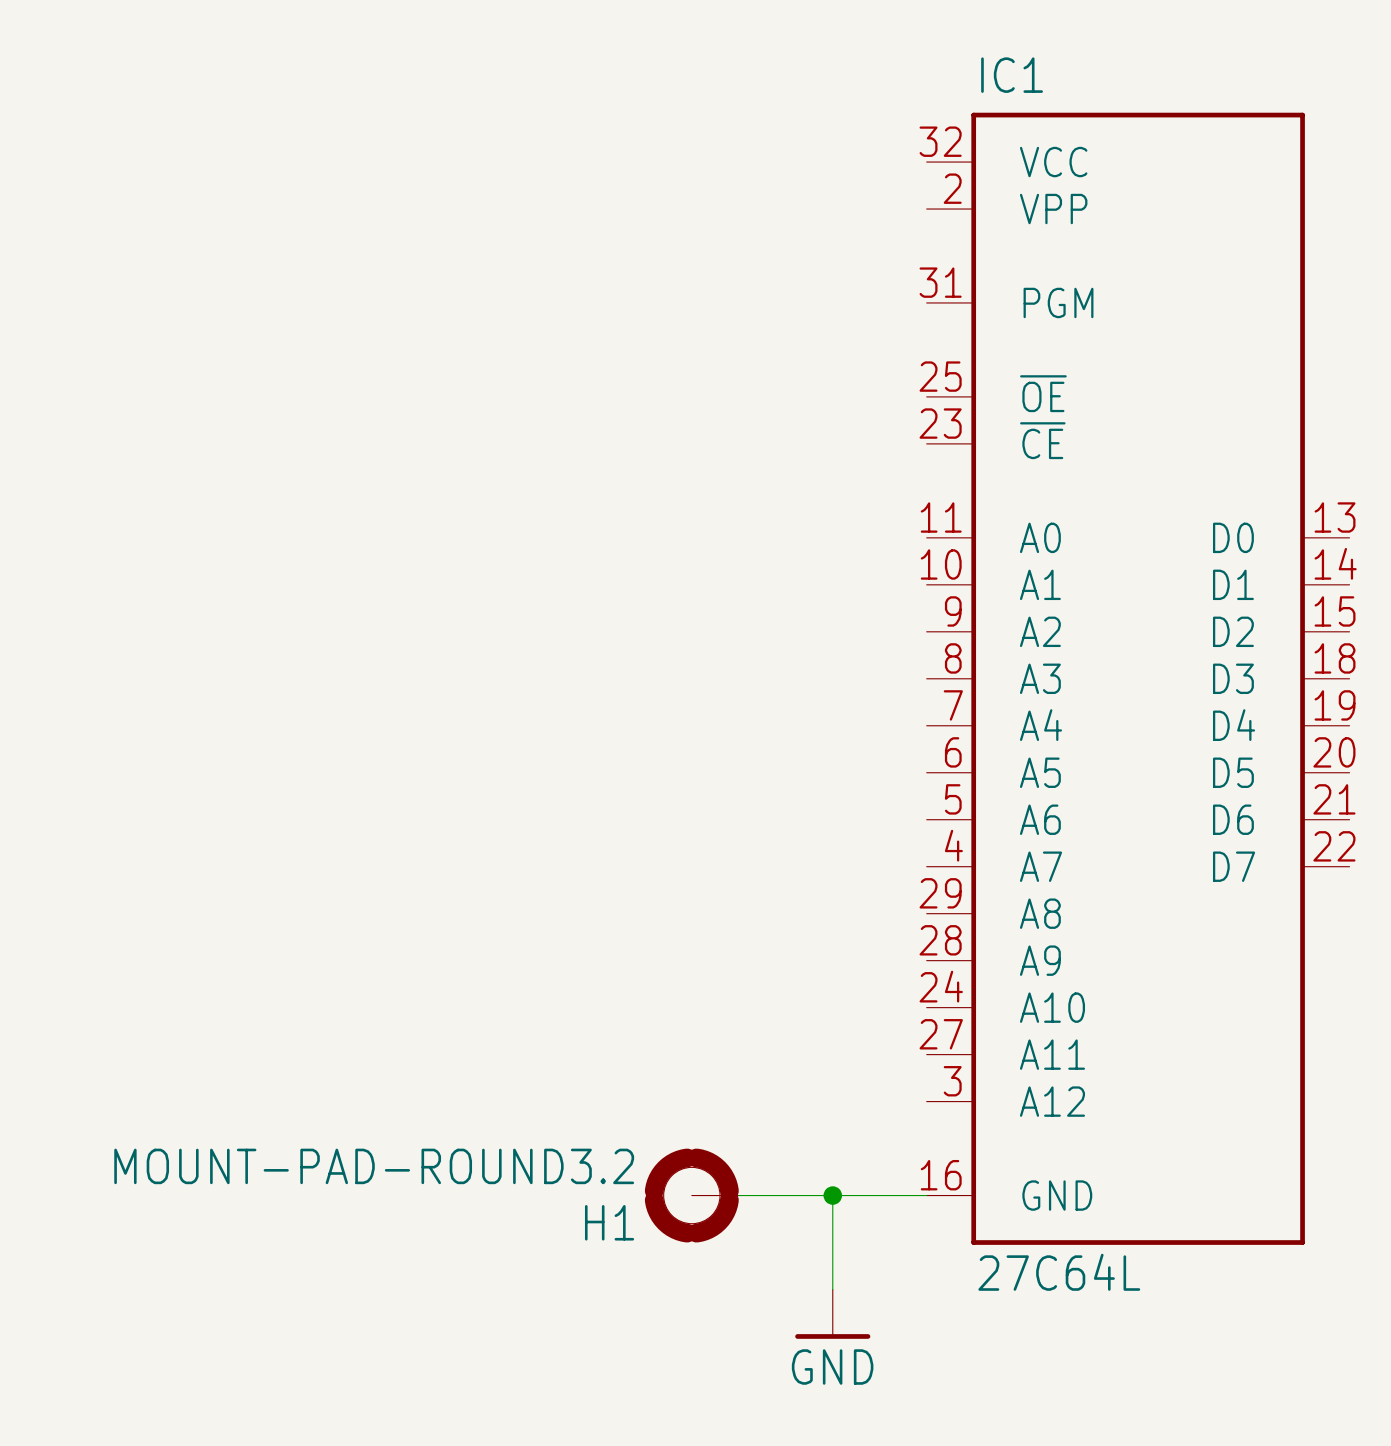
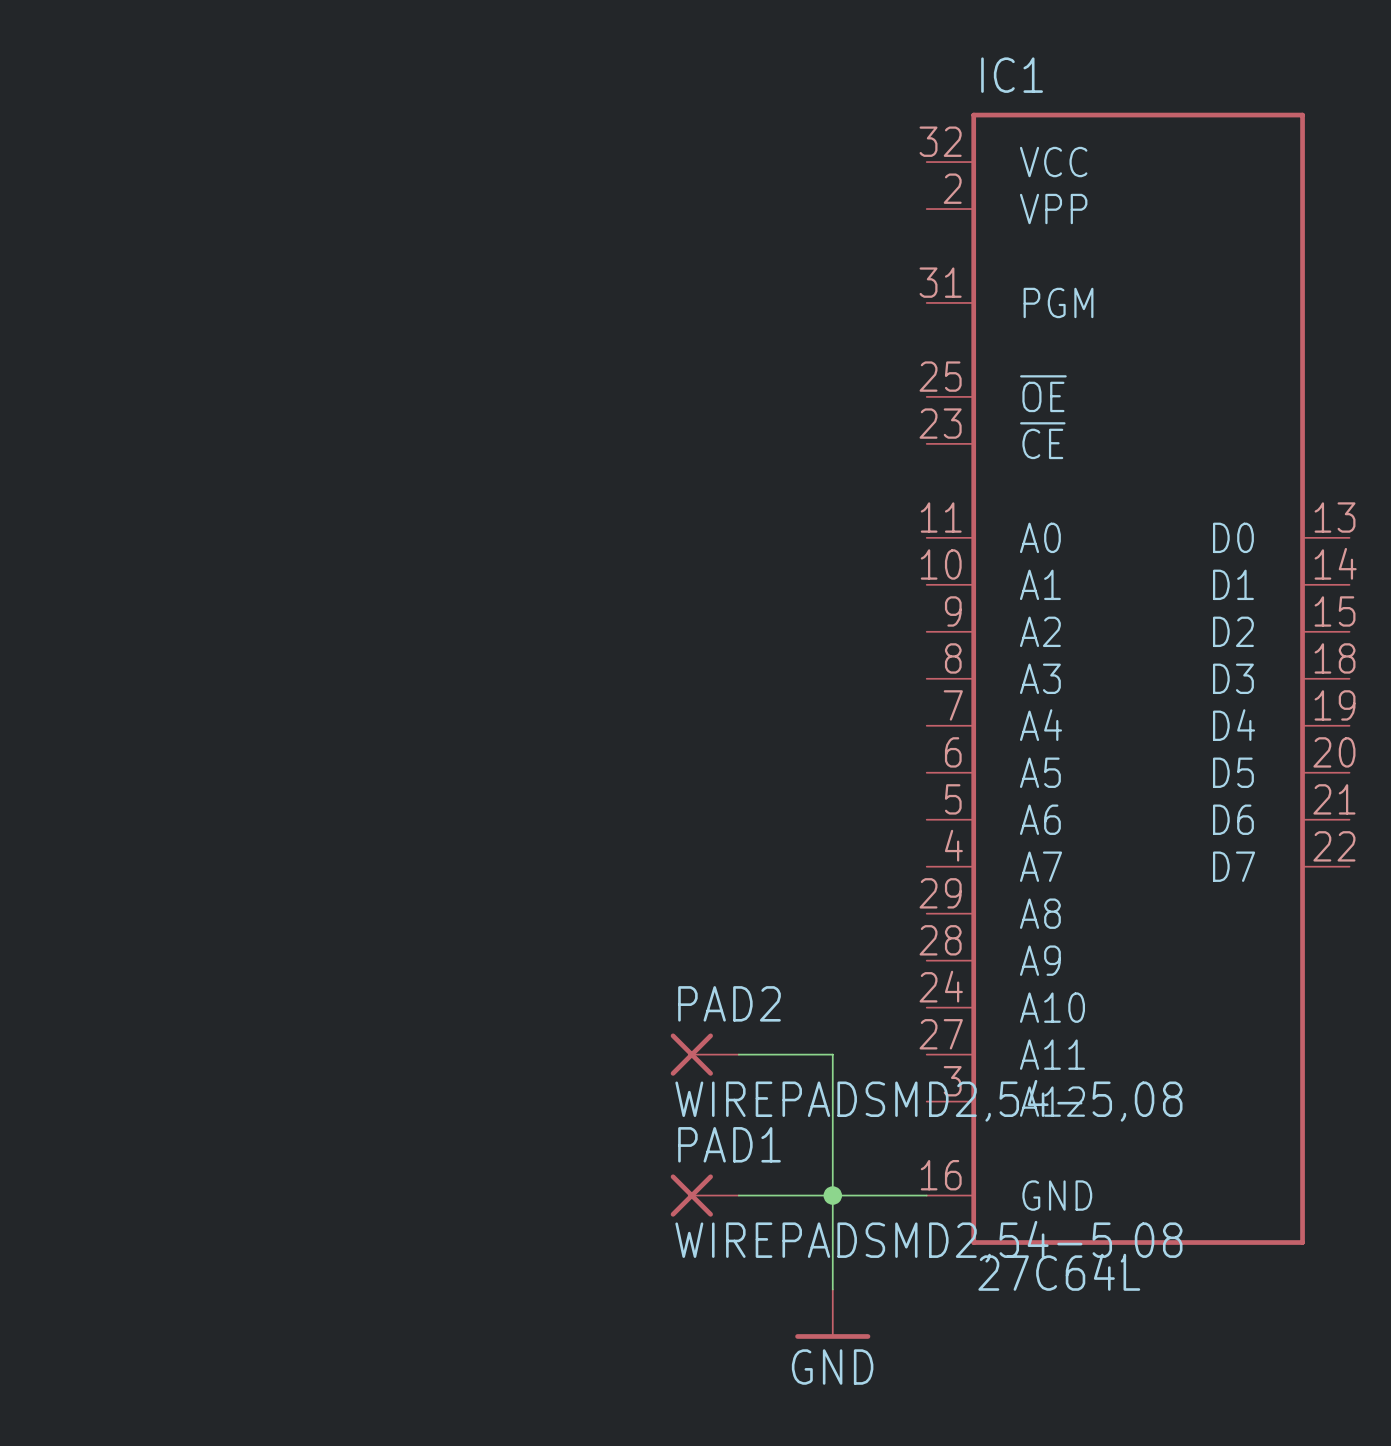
PAD2: none -> WIREPADSMD2,54-5,08 (704, 1054)
wire: none -> (738, 1054) (832, 1054) (832, 1195)
H1: MOUNT-PAD-ROUND3.2 (691, 1195) -> none
PAD1: none -> WIREPADSMD2,54-5,08 (704, 1195)

